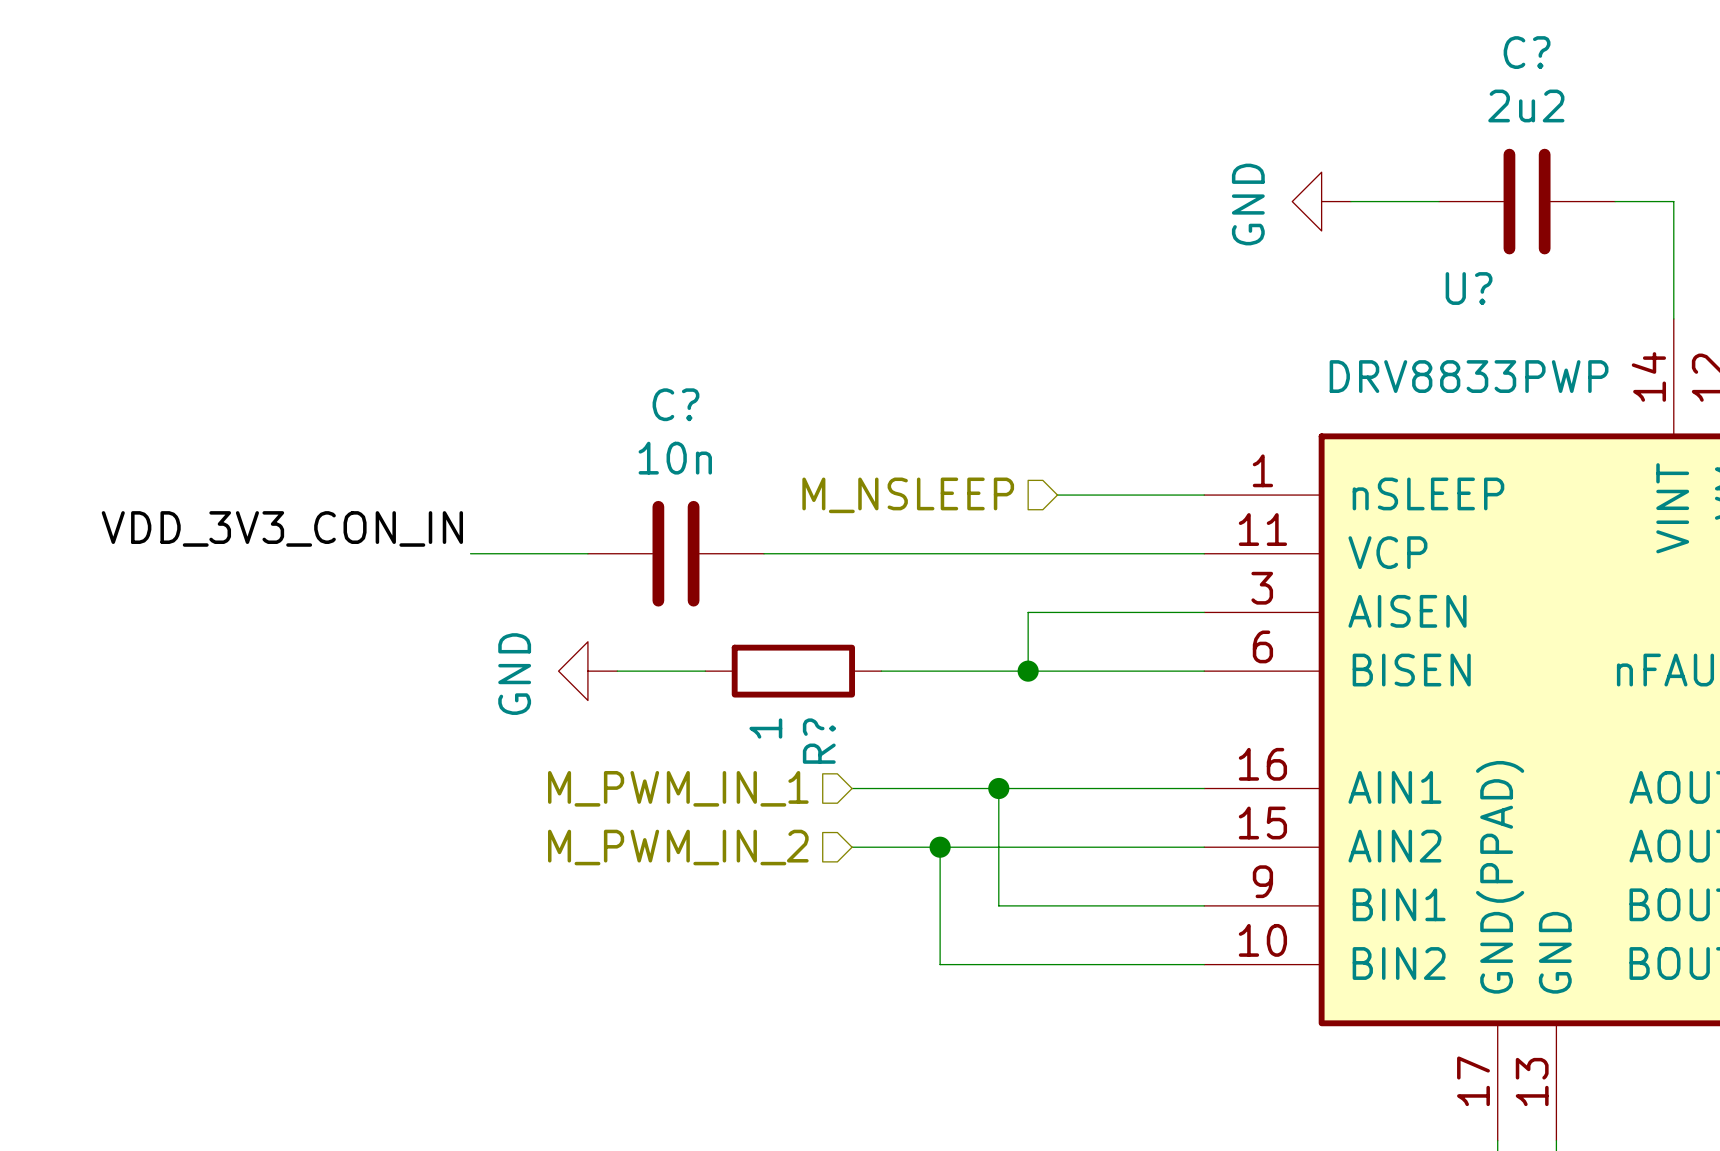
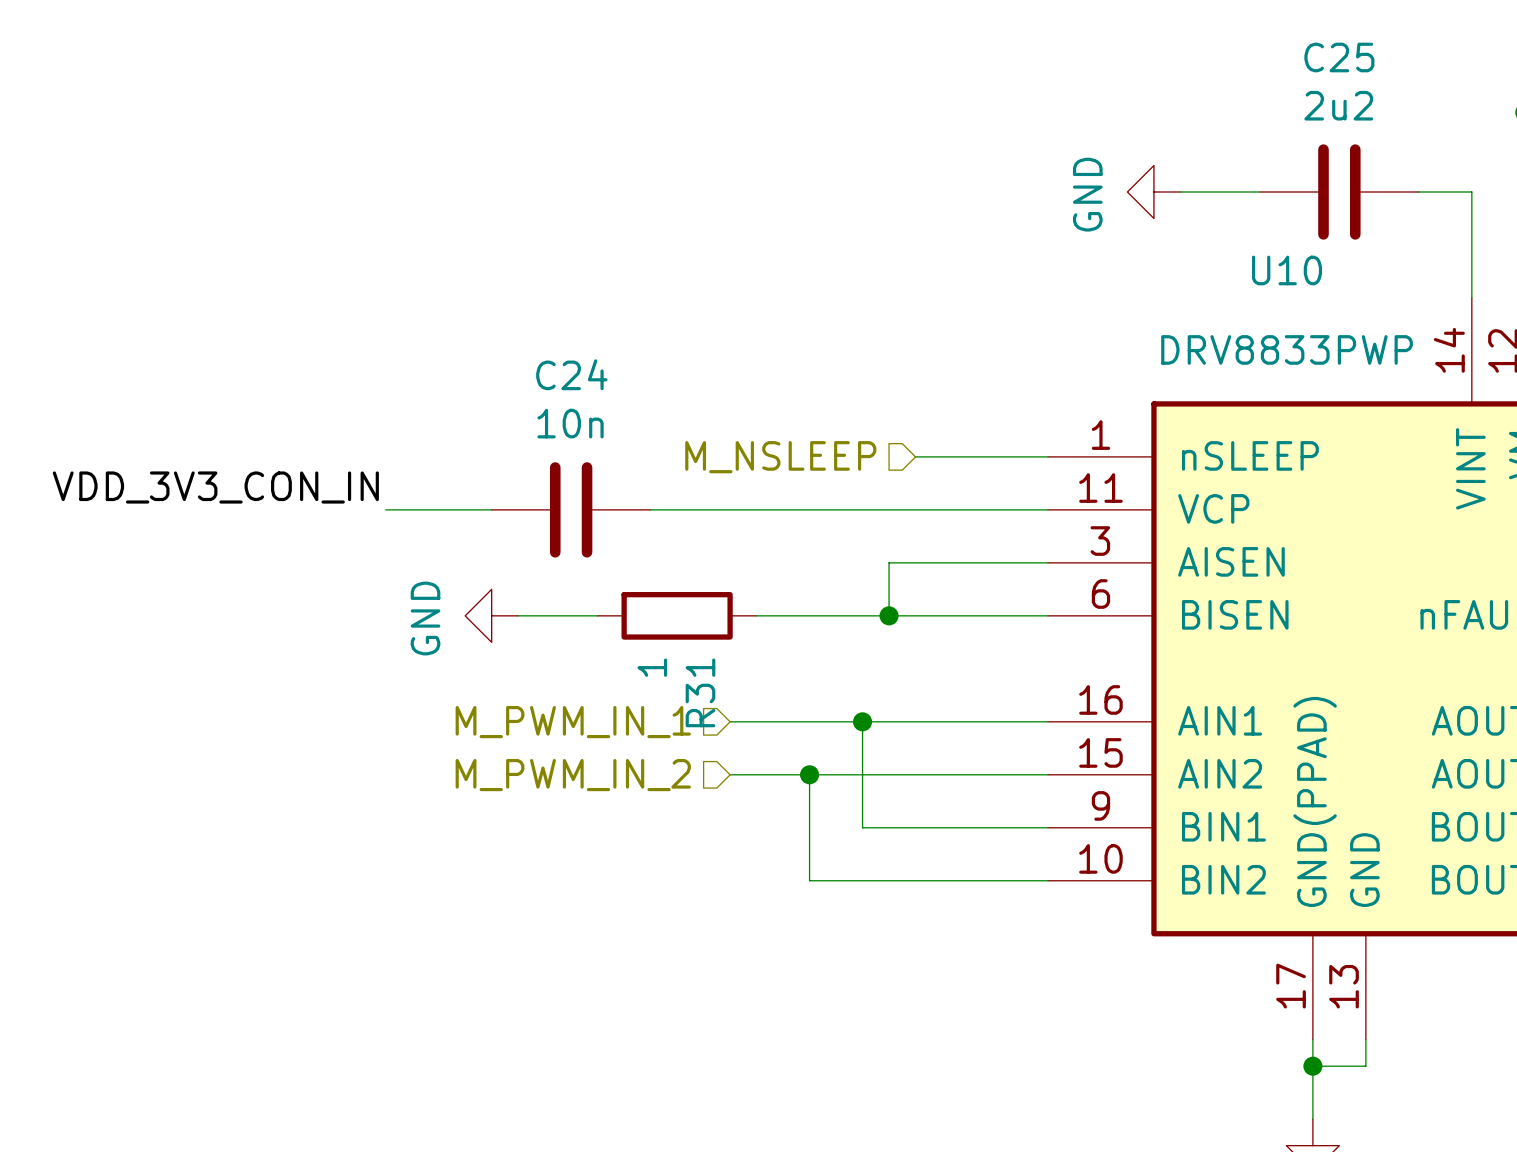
C? name: C? (1527, 52) -> C25 (1339, 57)
U? name: U? (1469, 288) -> U10 (1287, 270)
C? name: C? (675, 404) -> C24 (571, 374)
R? name: R? (819, 741) -> R31 (700, 692)

